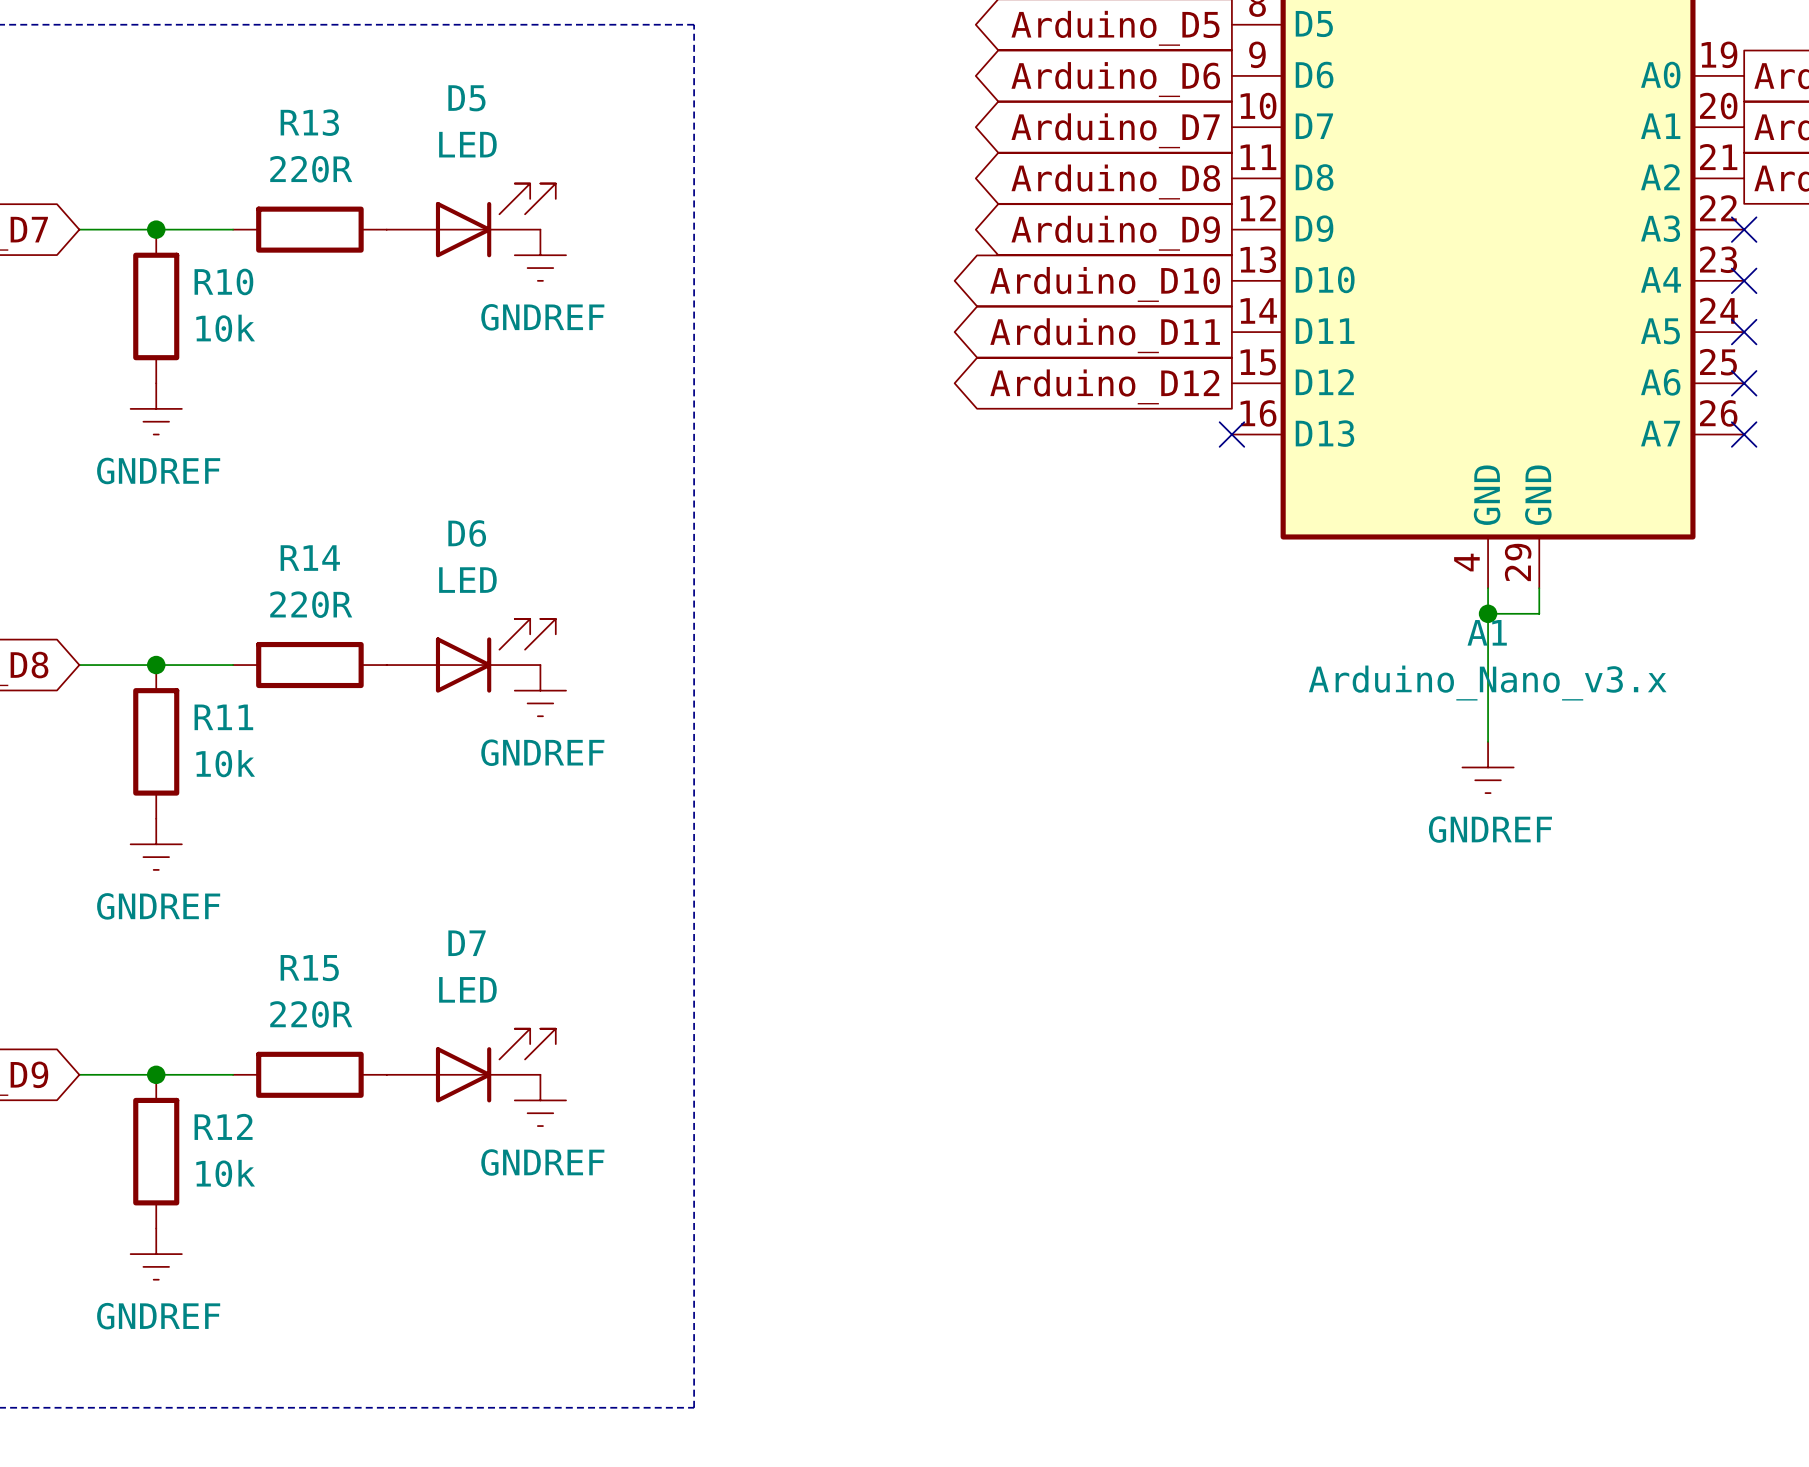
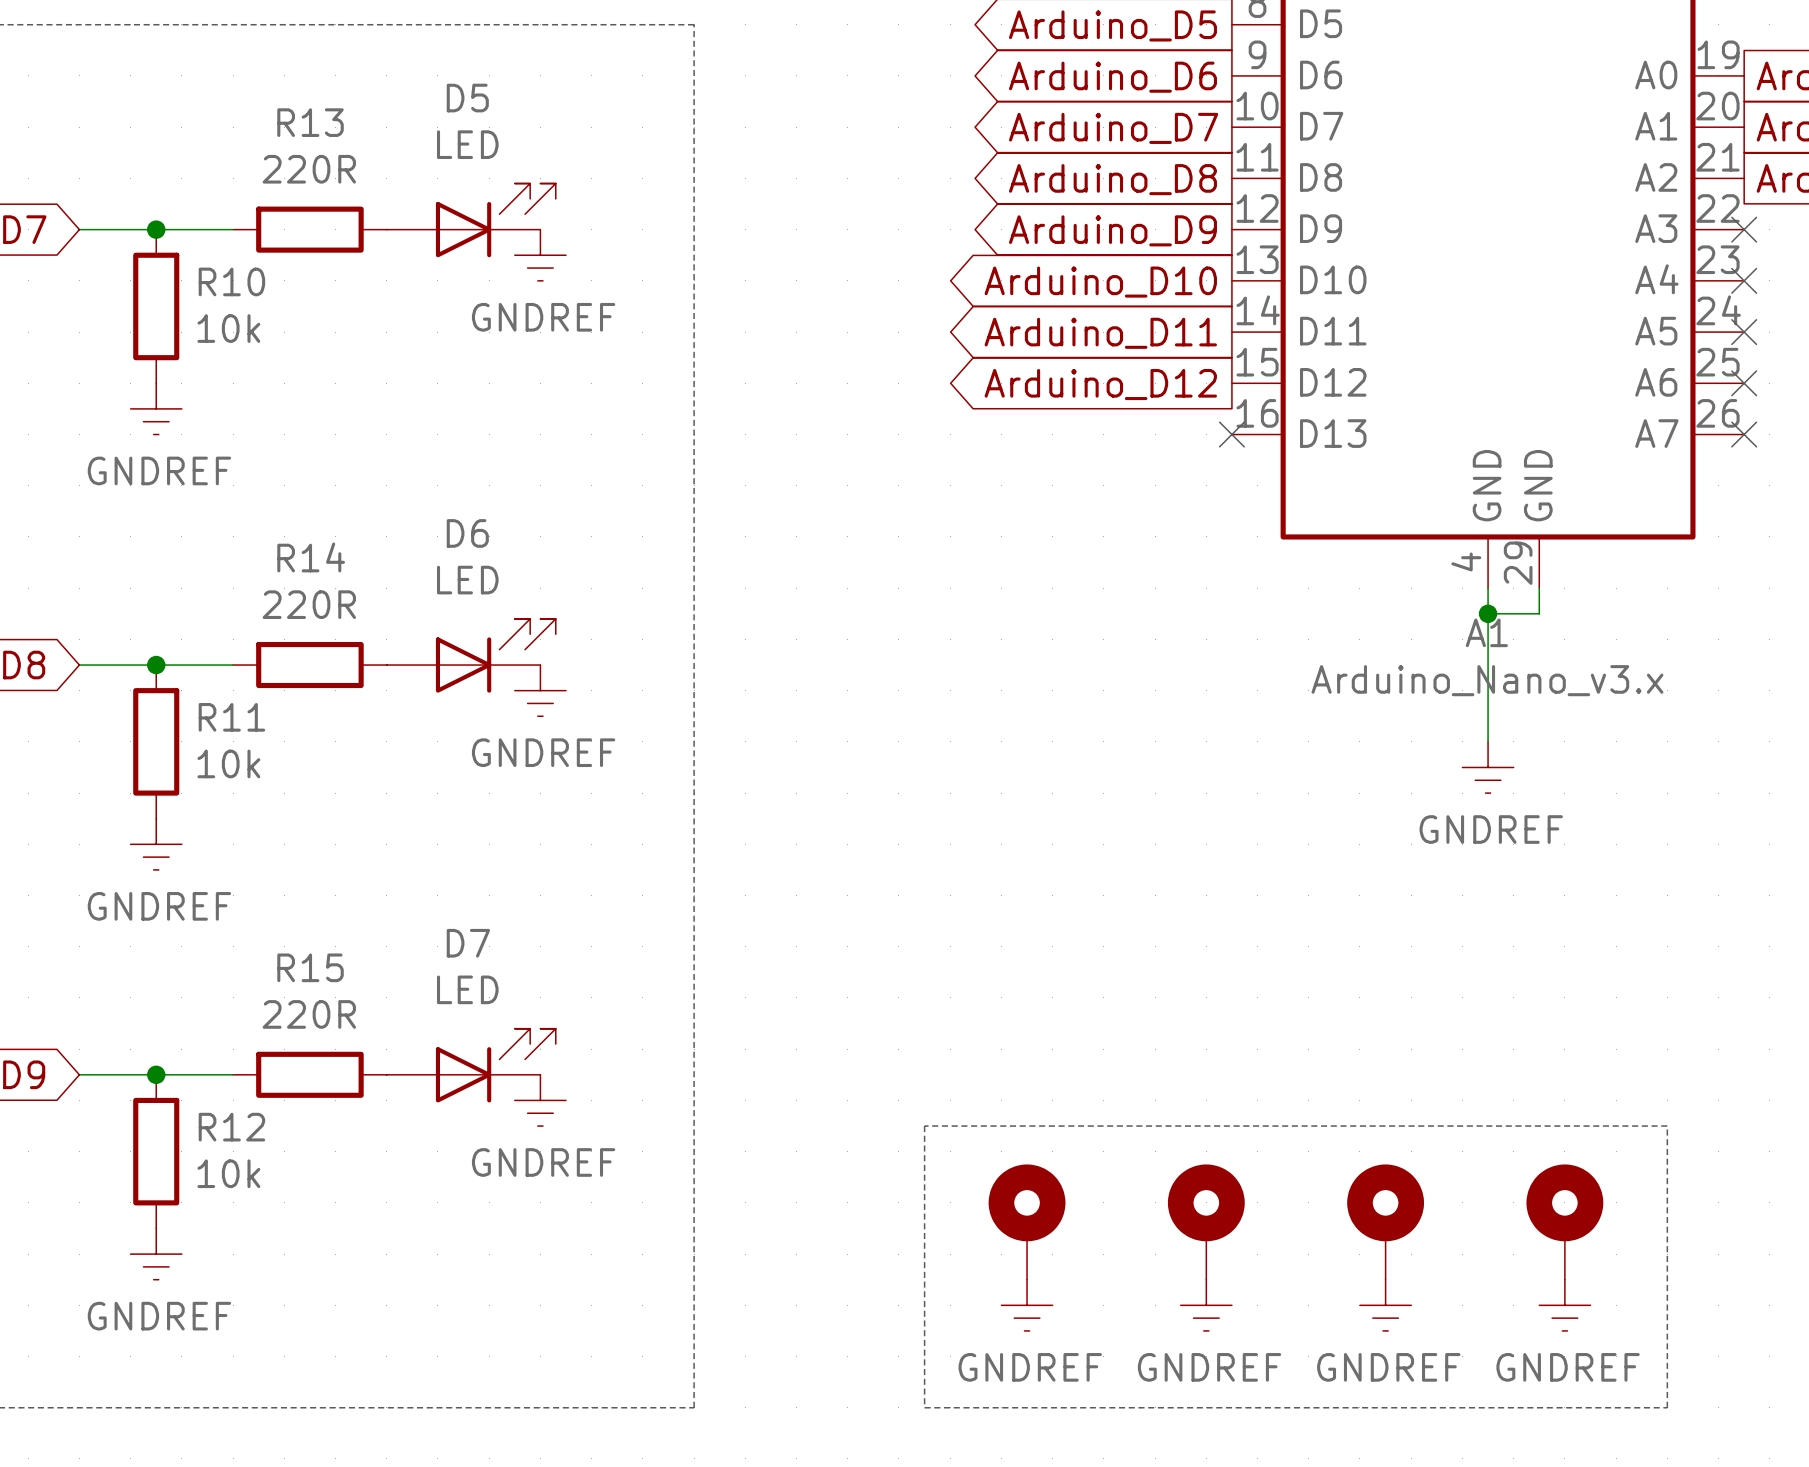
line: none -> (924, 1126) (1667, 1126) (1667, 1407) (924, 1407) (924, 1126)
part: none -> (1027, 1222)
part: none -> (1206, 1222)
part: none -> (1385, 1222)
part: none -> (1564, 1222)
power symbol: none -> GNDREF (1027, 1305)
power symbol: none -> GNDREF (1206, 1305)
power symbol: none -> GNDREF (1385, 1305)
power symbol: none -> GNDREF (1564, 1305)

